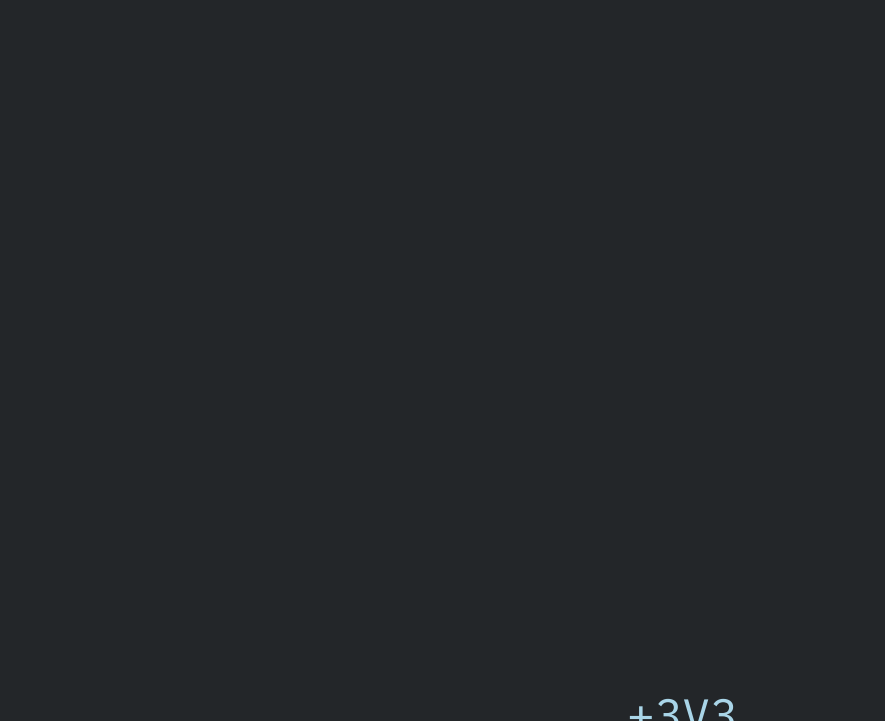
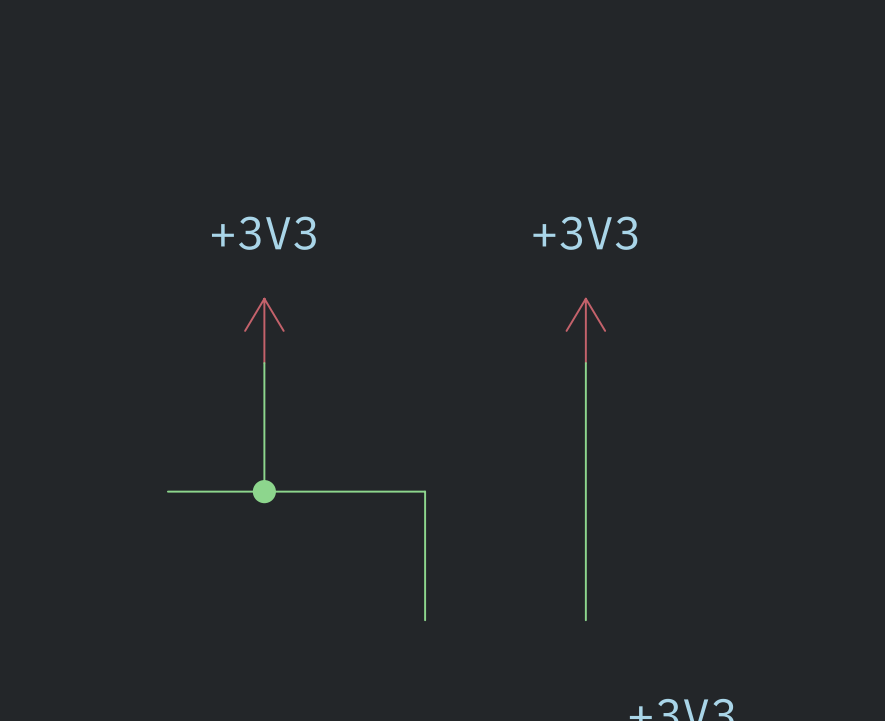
power symbol: none -> +3V3 (264, 330)
power symbol: none -> +3V3 (585, 330)
wire: none -> (264, 363) (264, 491)
wire: none -> (585, 363) (585, 620)
wire: none -> (167, 491) (425, 491) (425, 620)
junction: none -> (264, 491)

